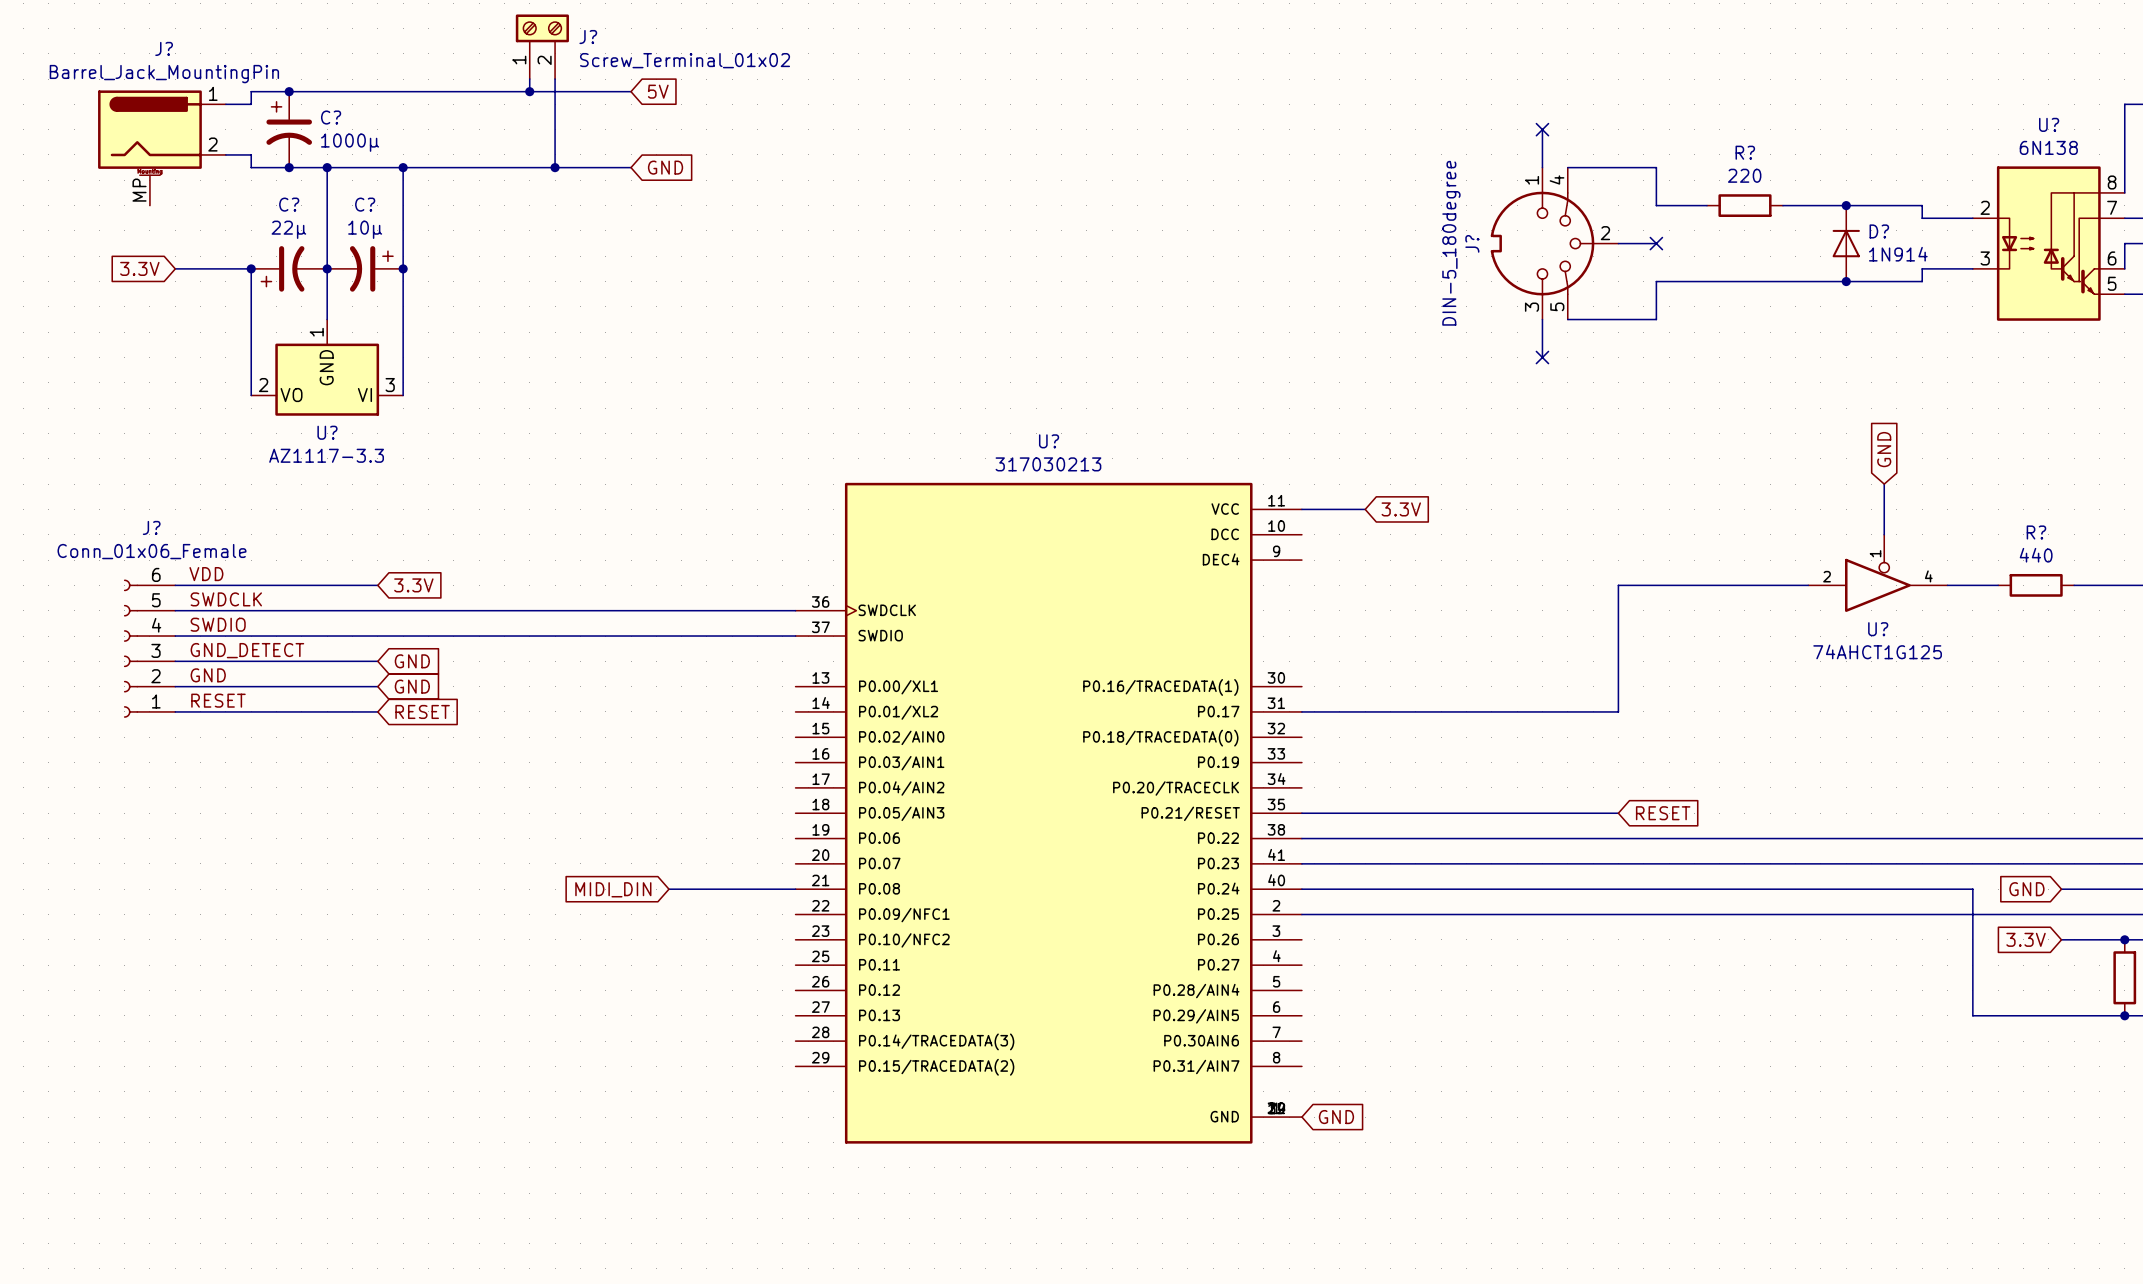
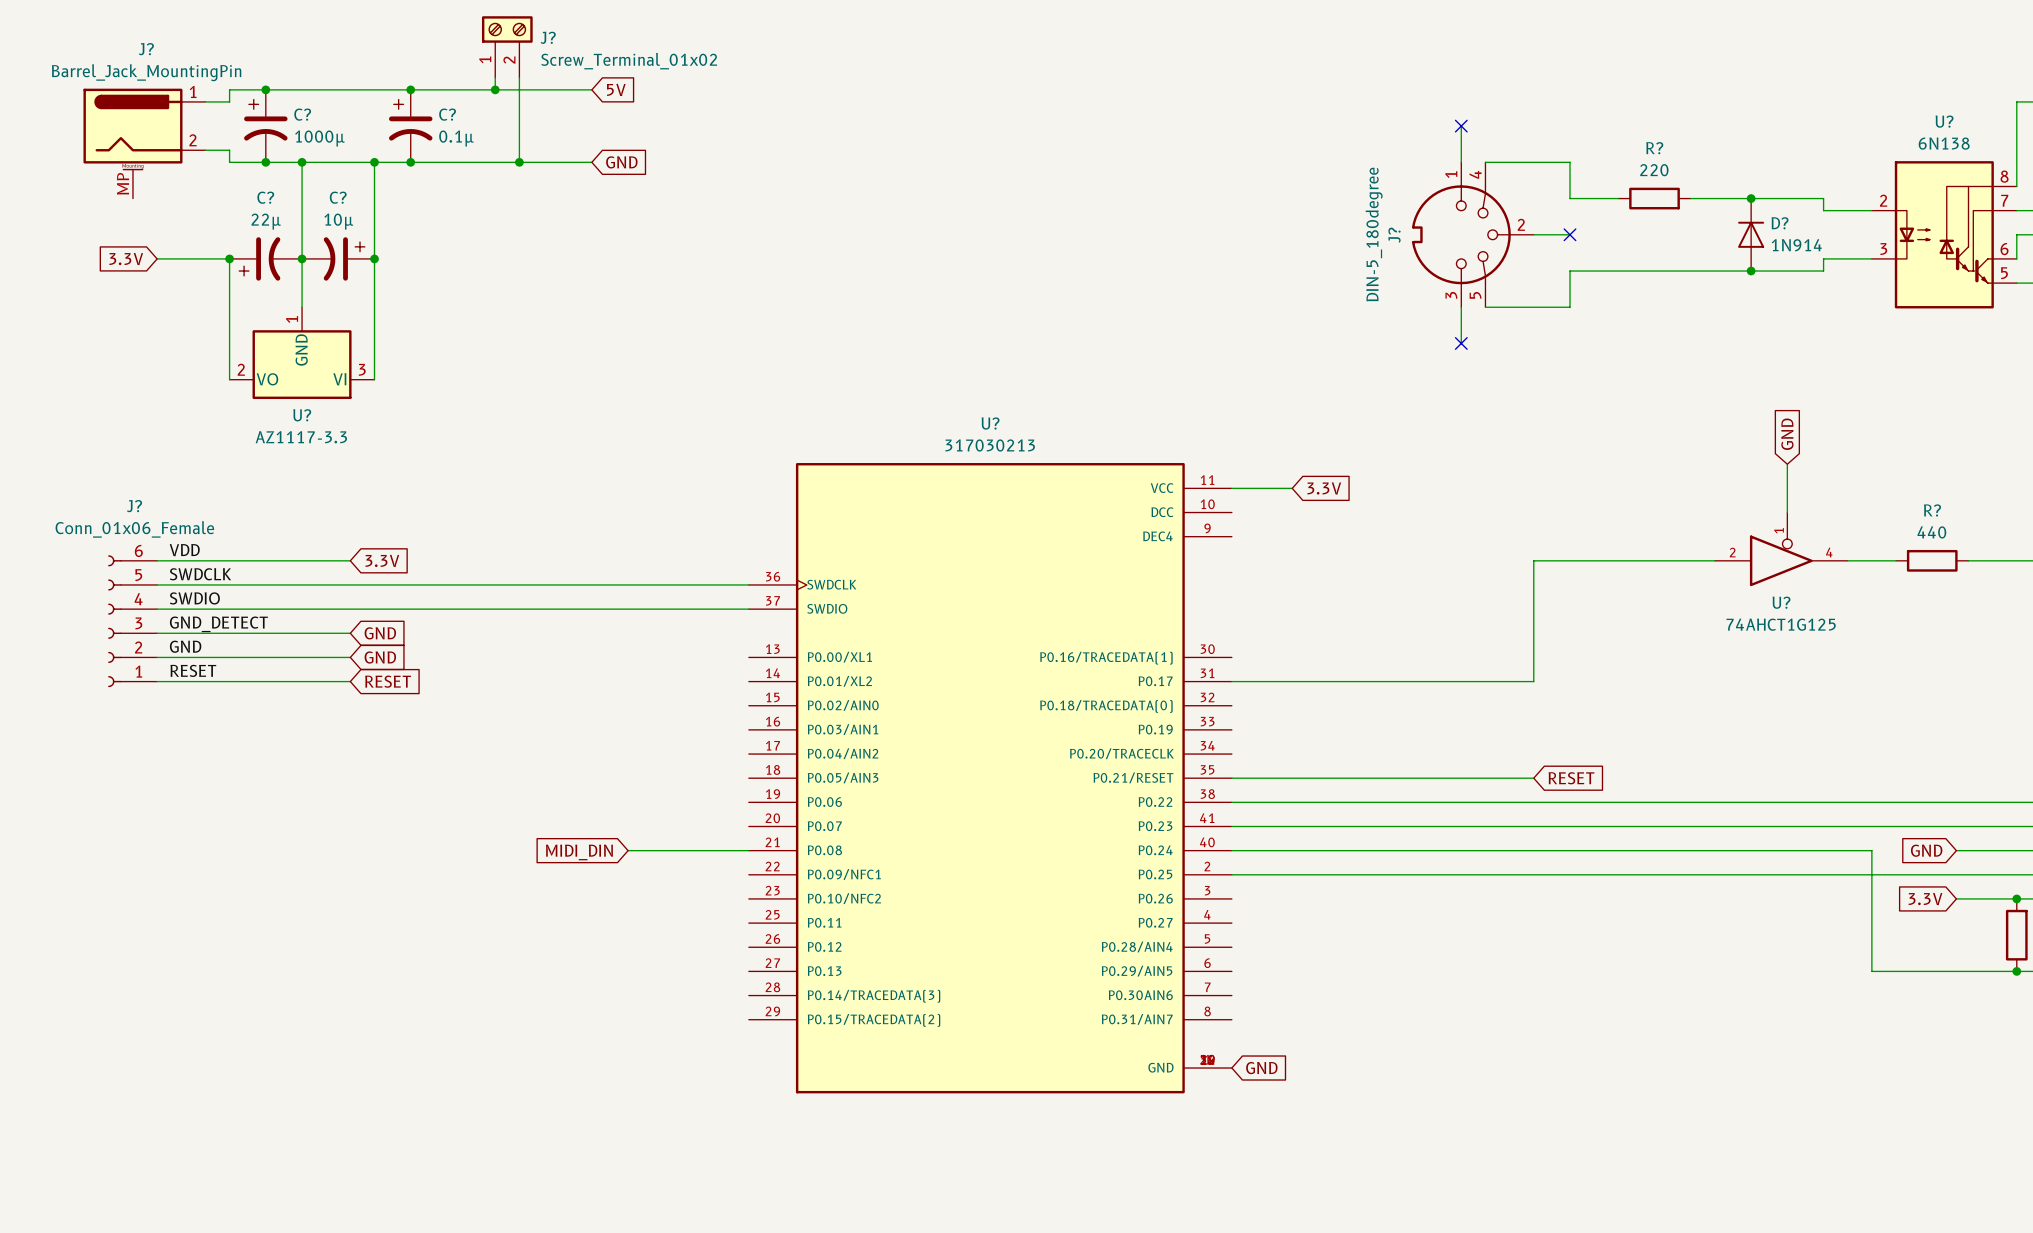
junction: none -> (410, 89)
C?: none -> 0.1µ (410, 126)
junction: none -> (410, 162)

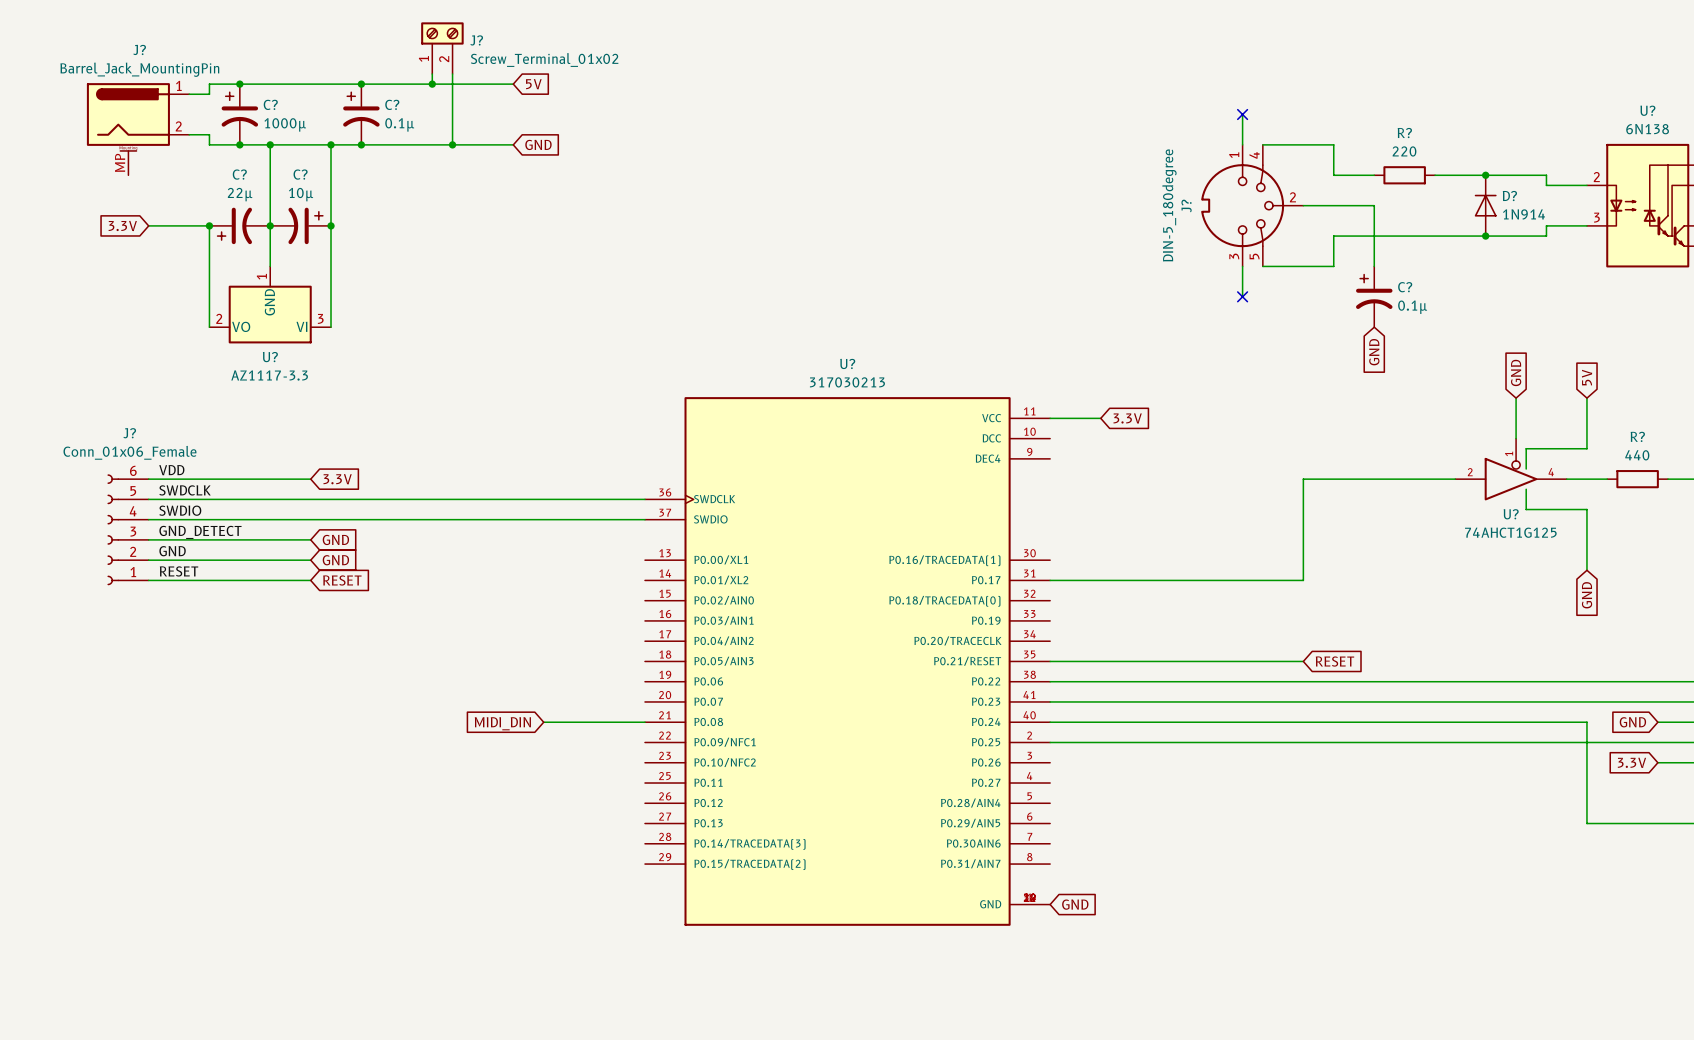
wire: none -> (1333, 205) (1374, 205) (1374, 266)
no-connect mark: (1569, 234) -> none
C?: none -> 0.1µ (1374, 296)
global label: none -> GND (1374, 352)
global label: none -> 5V (1587, 377)
wire: none -> (1586, 398) (1586, 448) (1526, 448) (1526, 469)
wire: none -> (1526, 489) (1526, 509) (1586, 509) (1586, 570)
global label: none -> GND (1587, 595)

